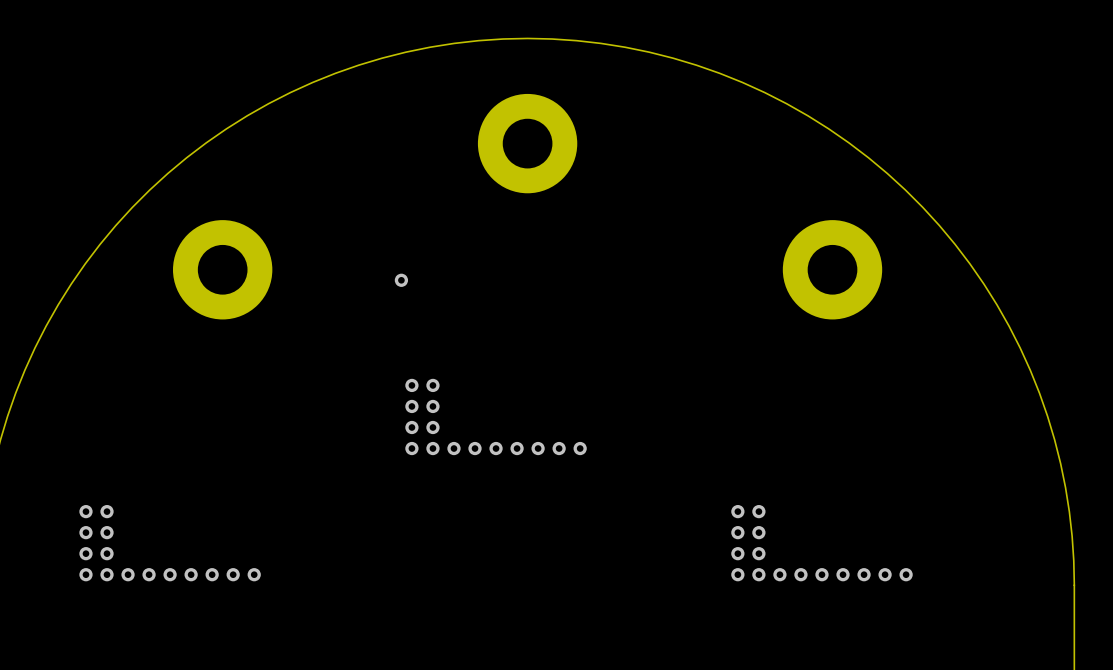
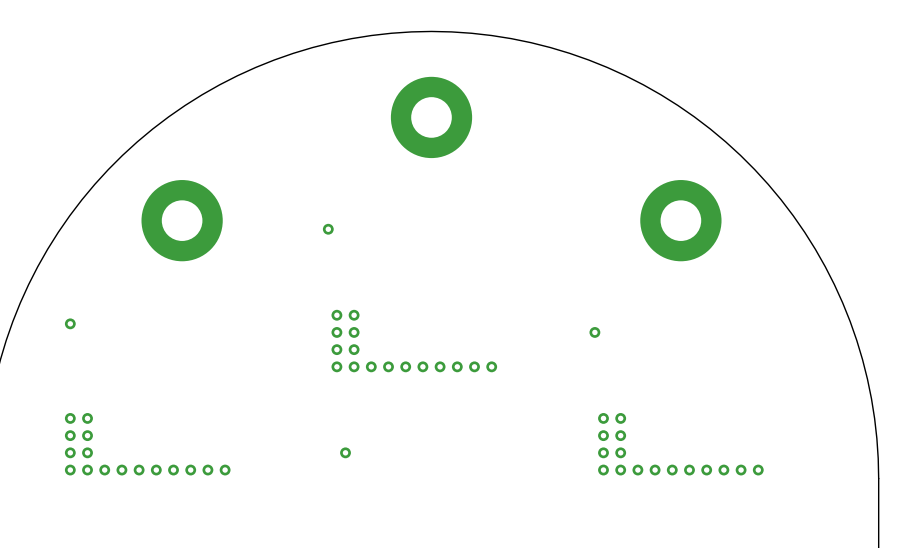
via: none -> (70, 323)
via: none -> (594, 332)
via: none -> (491, 366)
via: none -> (345, 452)
via: none -> (225, 470)
via: none -> (758, 470)

